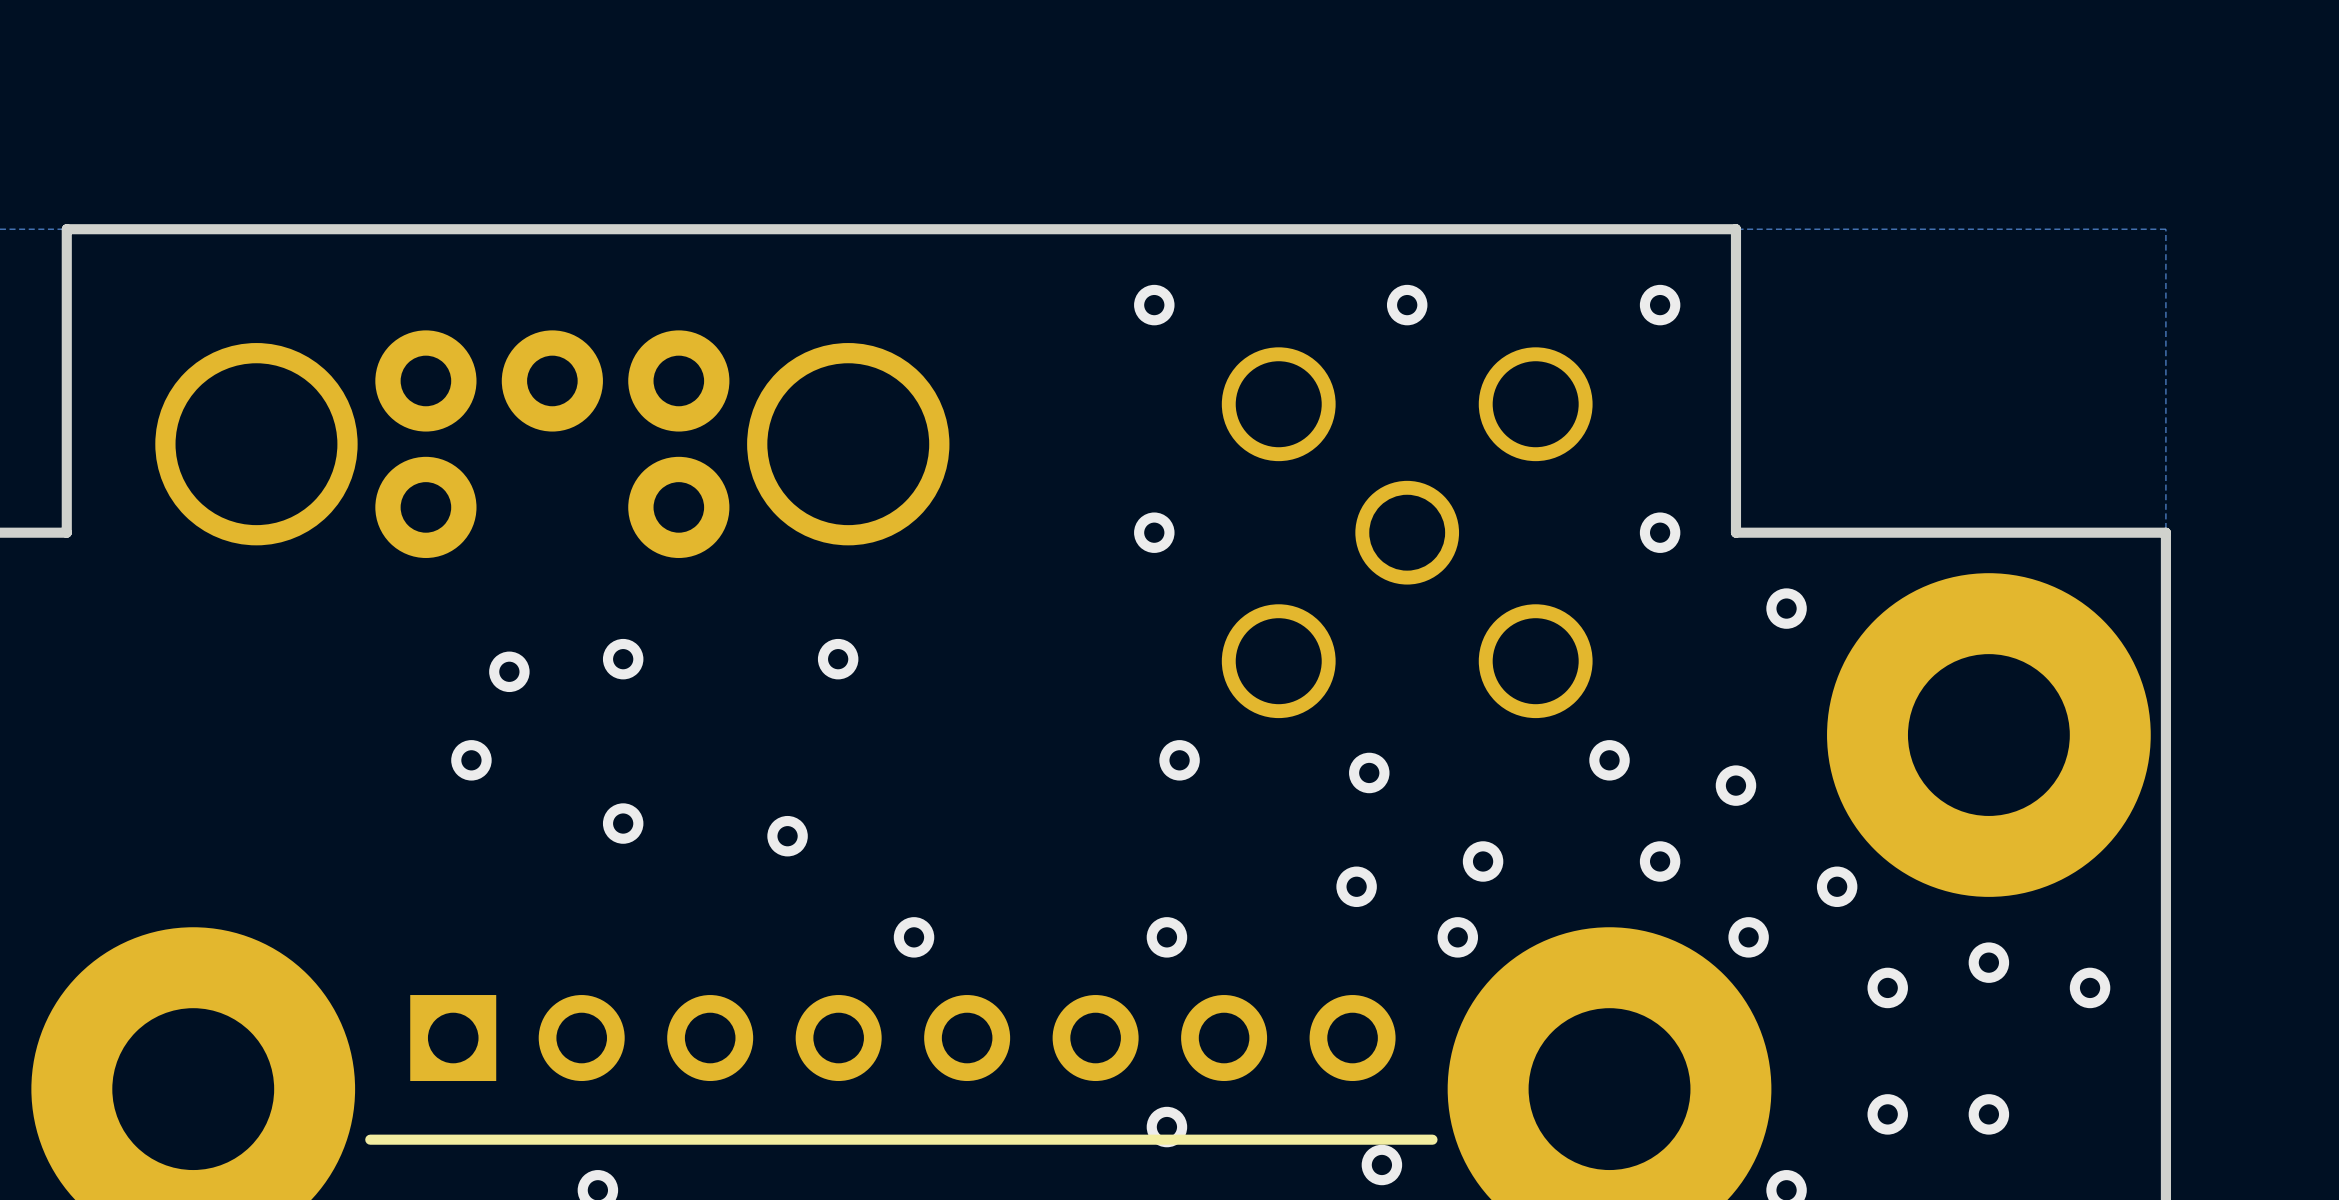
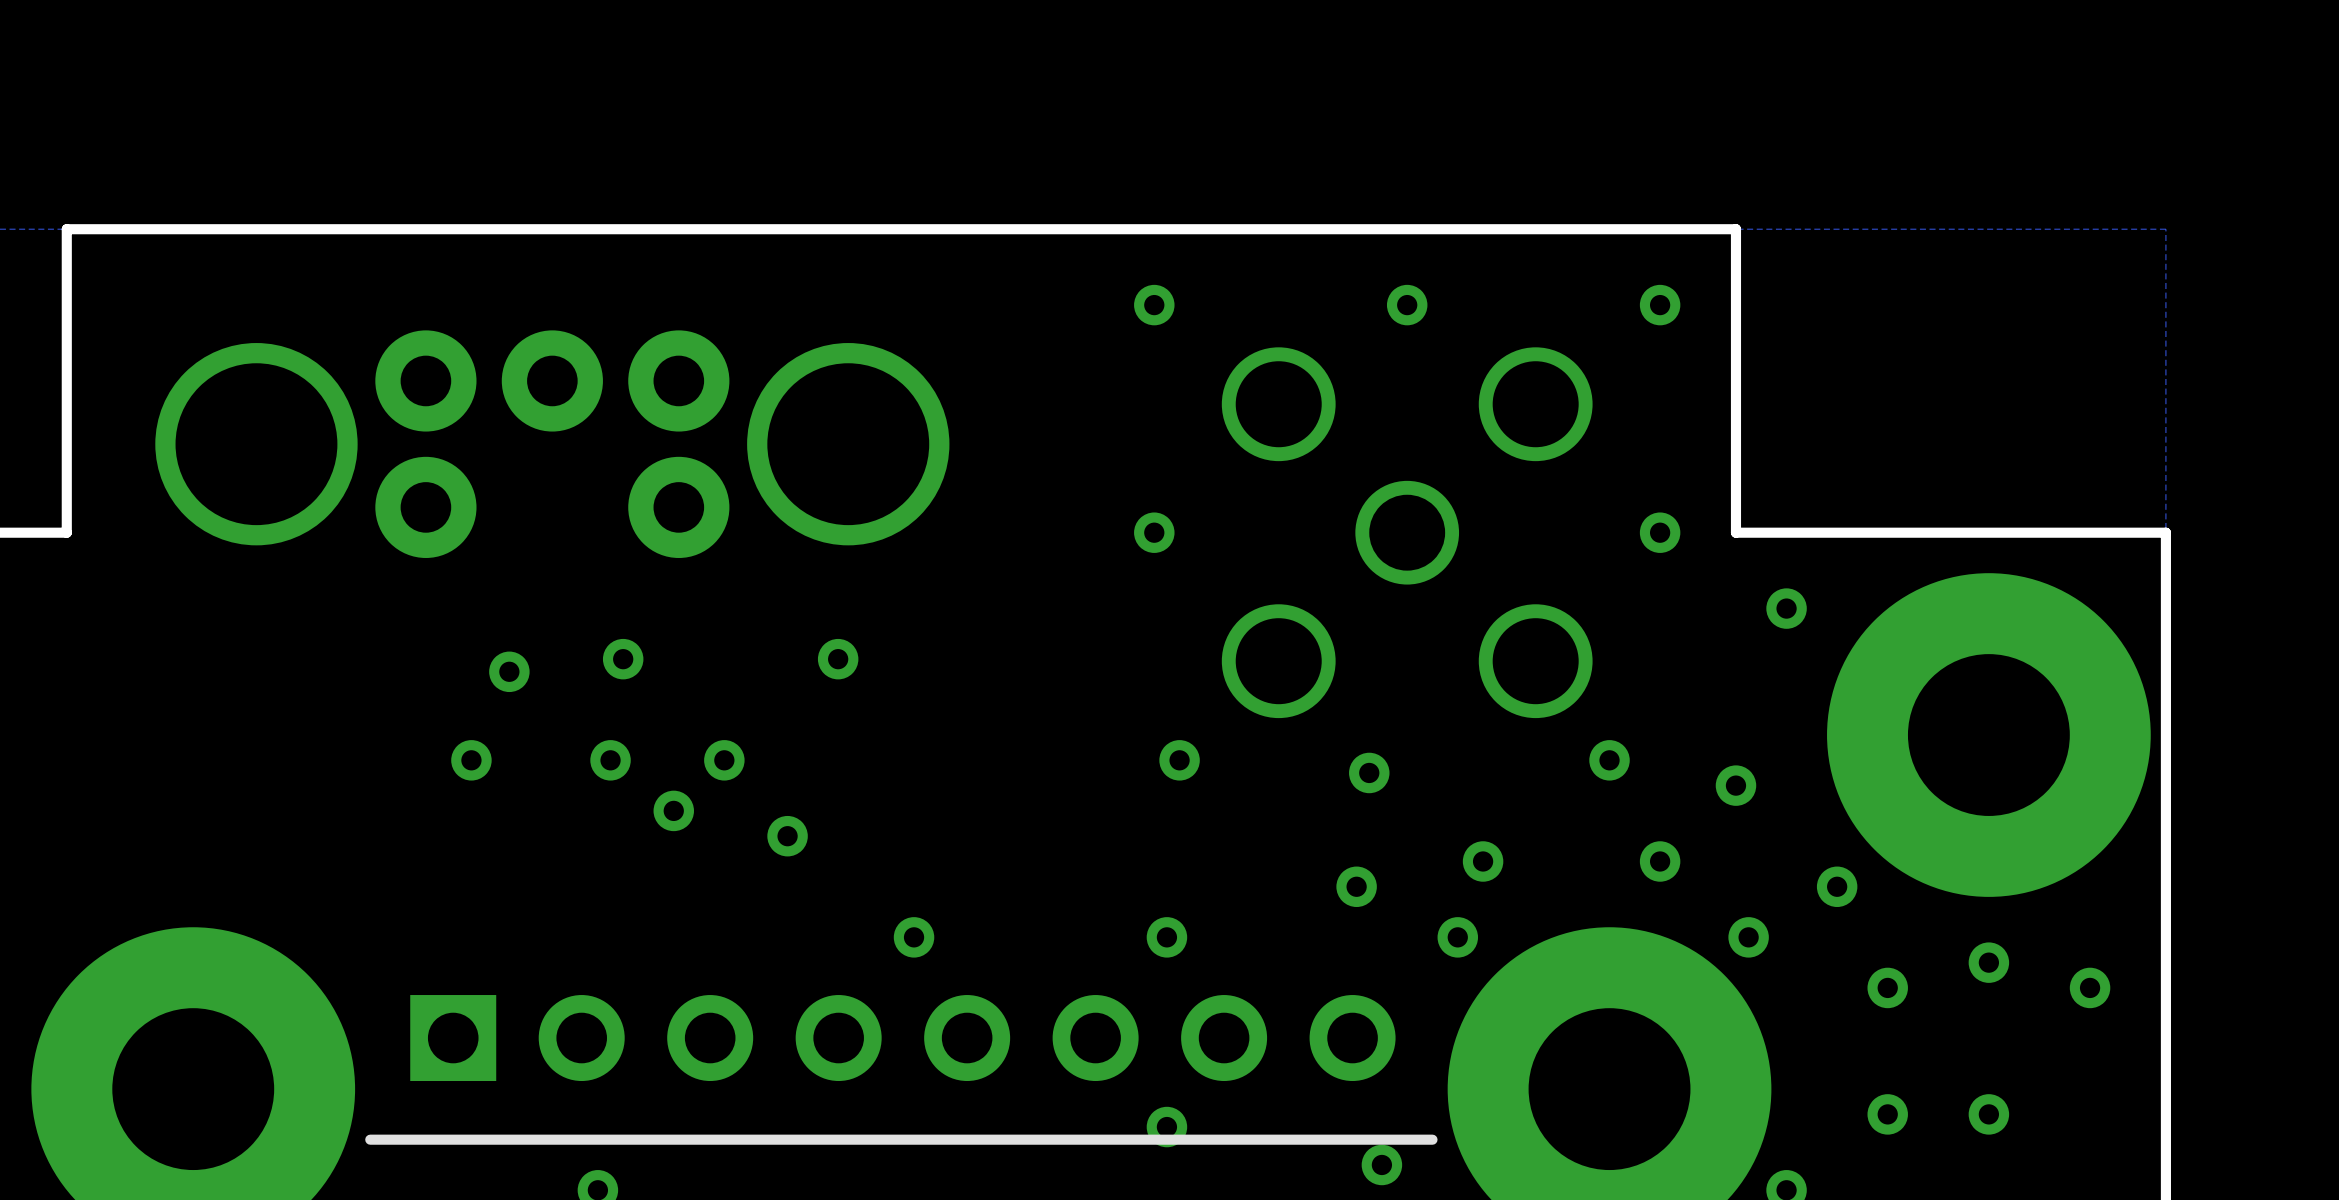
via: none -> (610, 760)
via: none -> (724, 760)
via: none -> (673, 810)
via: (623, 823) -> none

